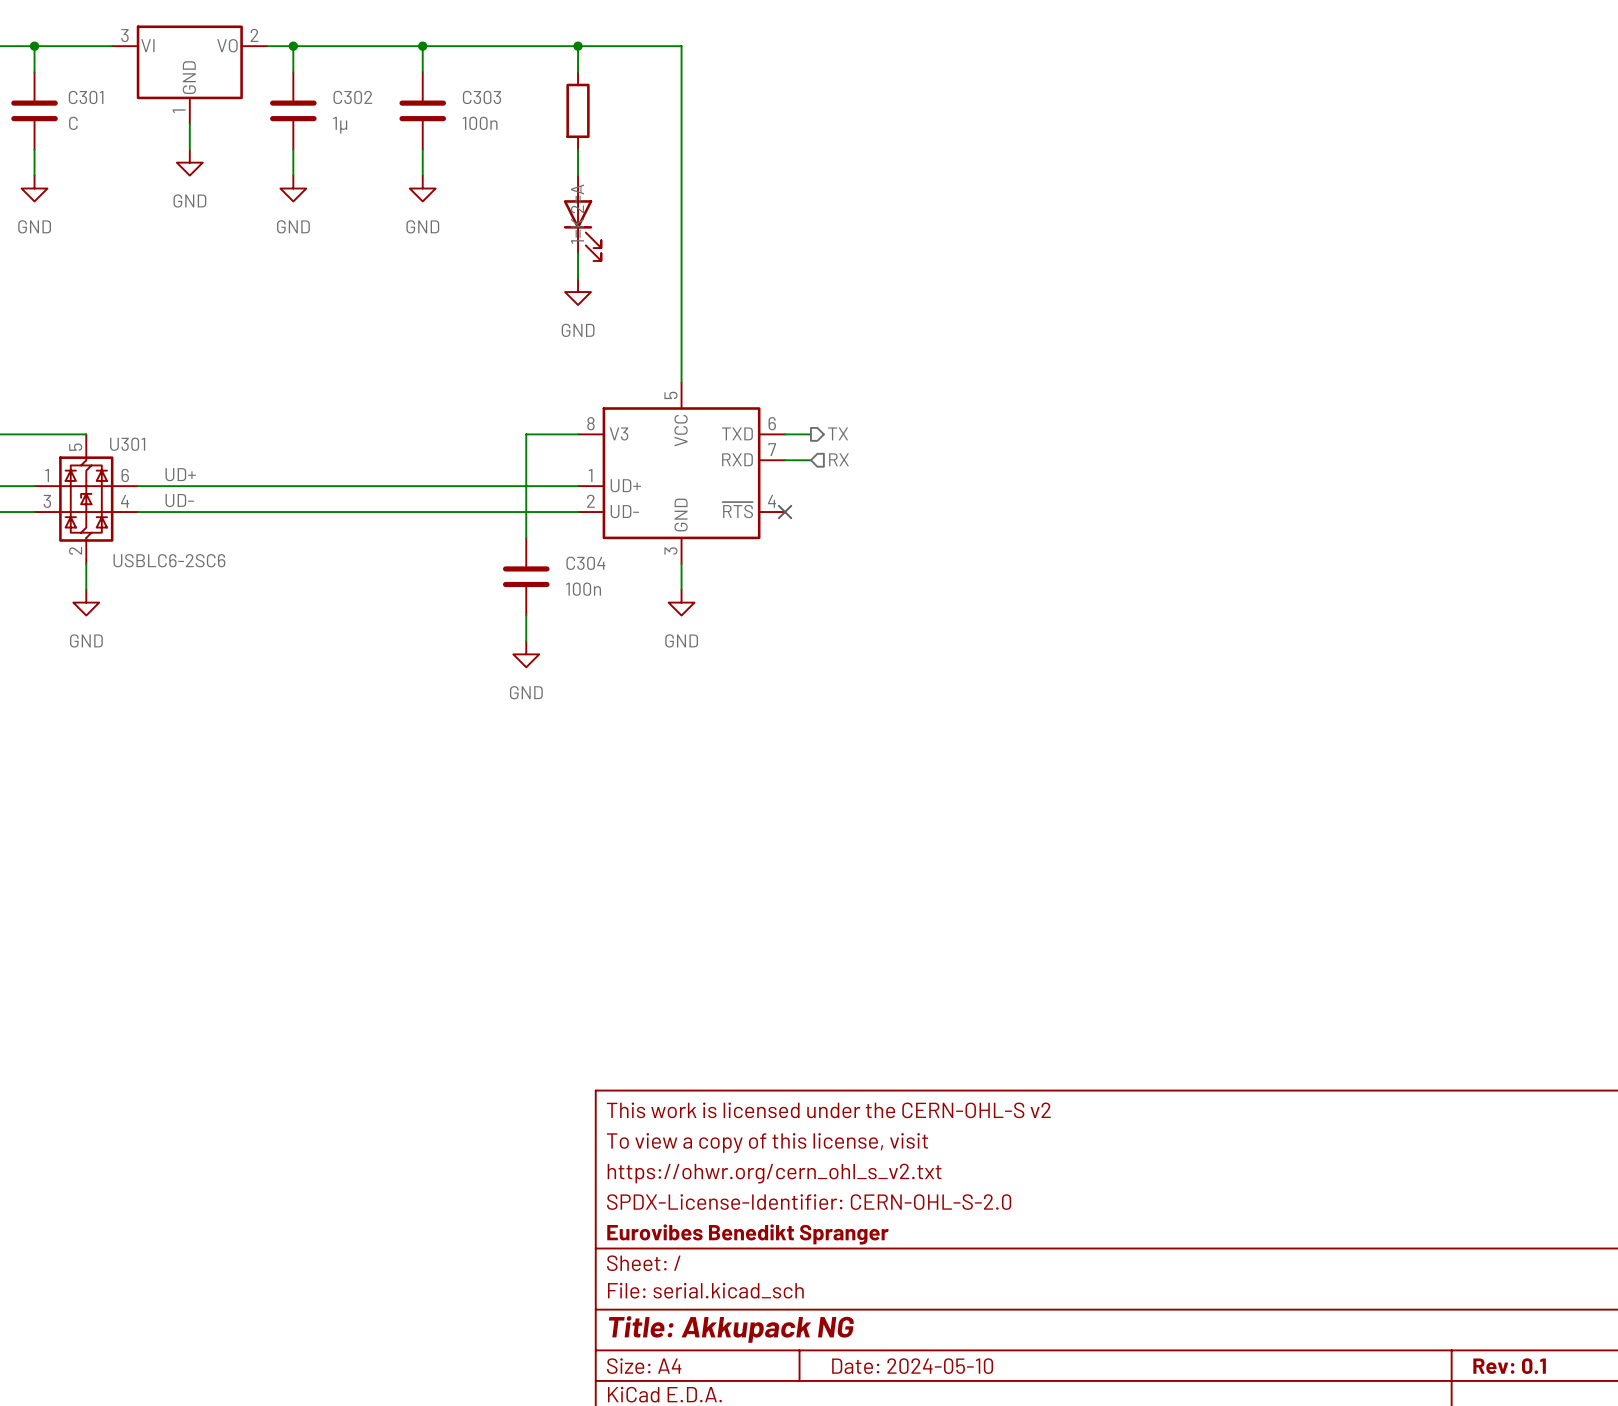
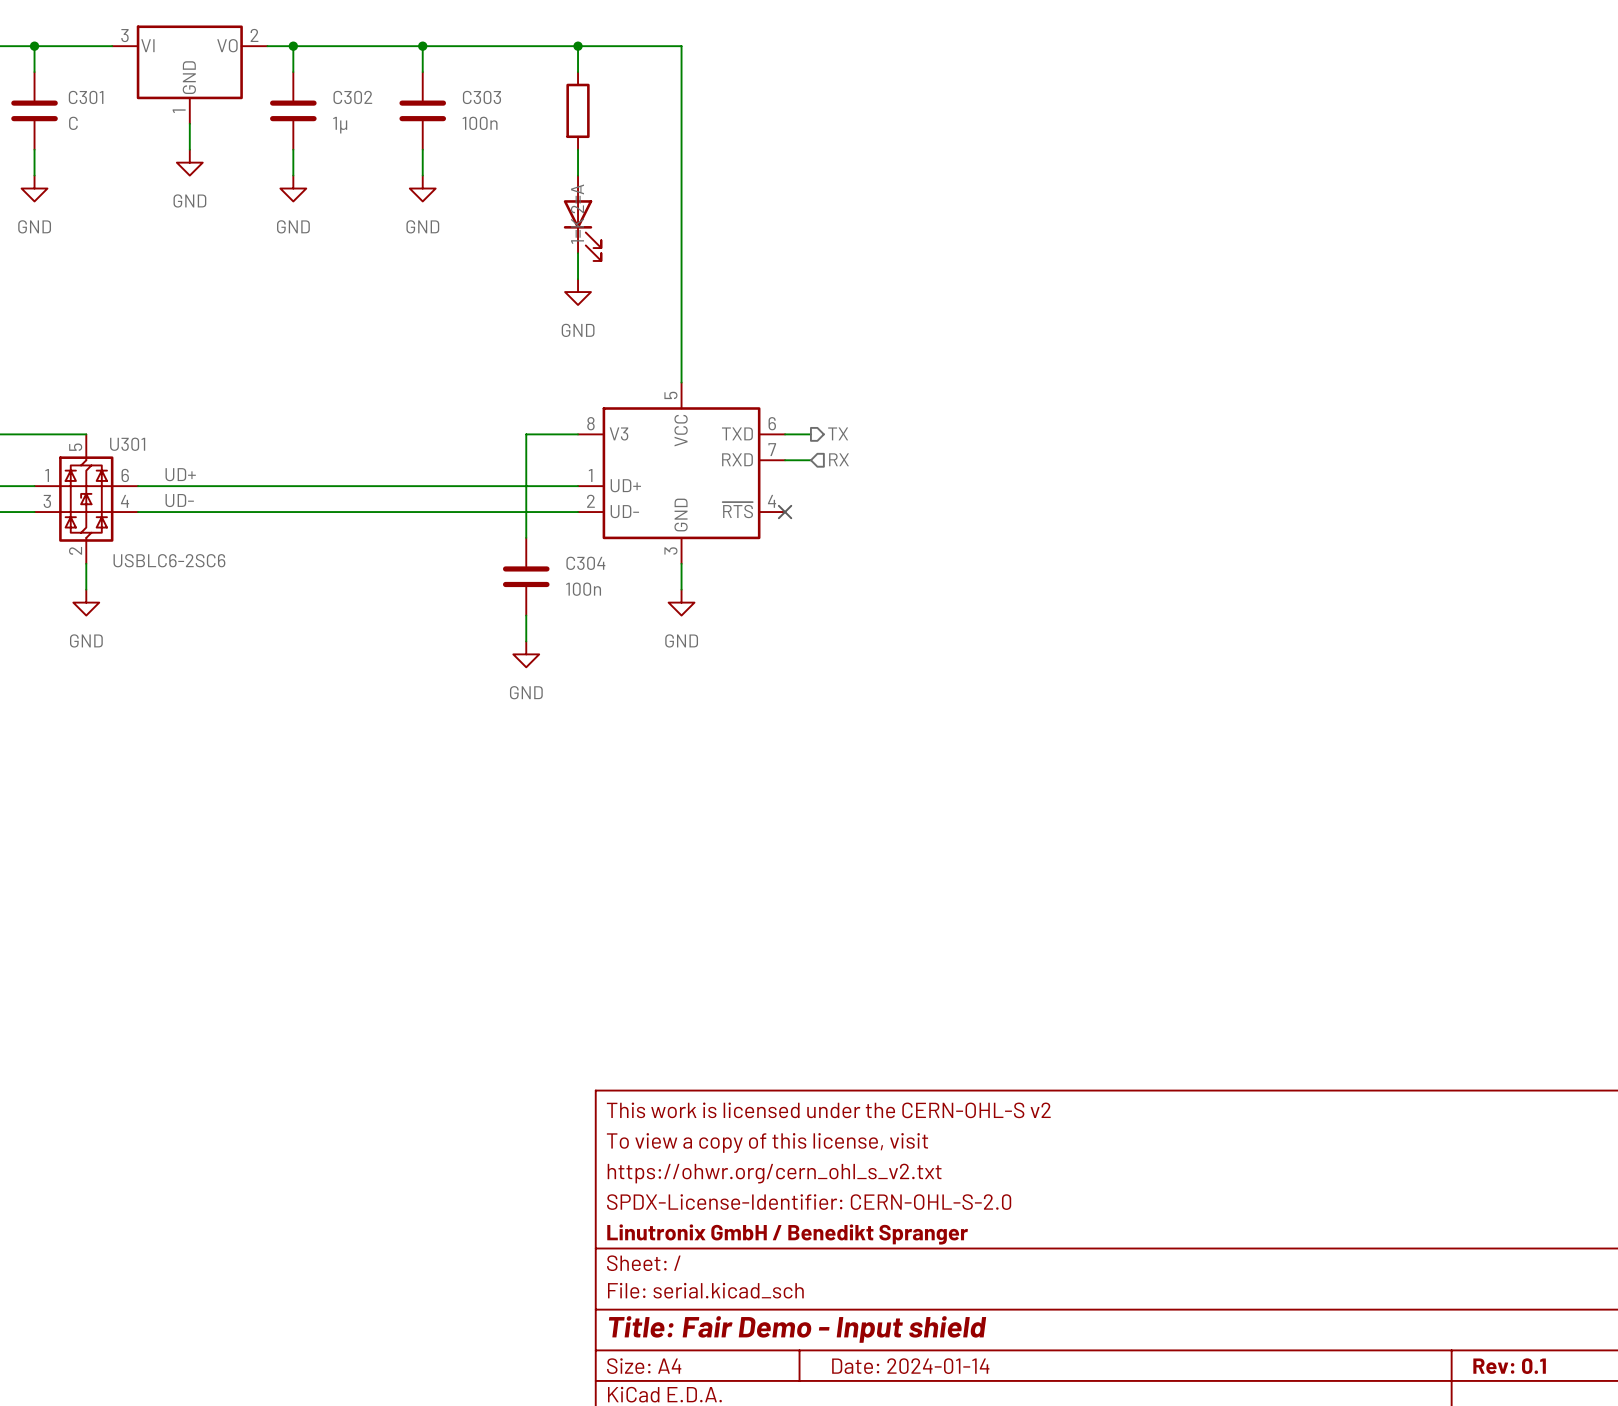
title block: Eurovibes Benedikt Spranger (747, 1234) -> Linutronix GmbH / Benedikt Spranger (787, 1234)
title block: Title: Akkupack NG (731, 1329) -> Title: Fair Demo - Input shield (797, 1329)
title block: Date: 2024-05-10 (912, 1366) -> Date: 2024-01-14 (910, 1366)

